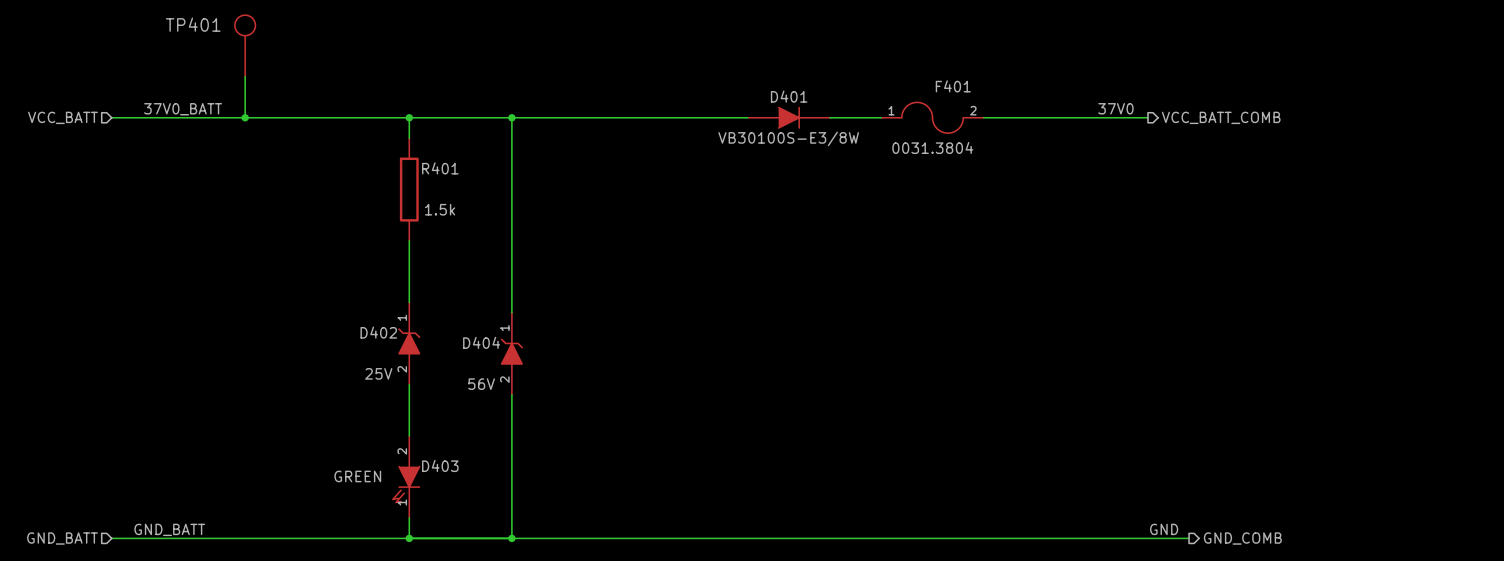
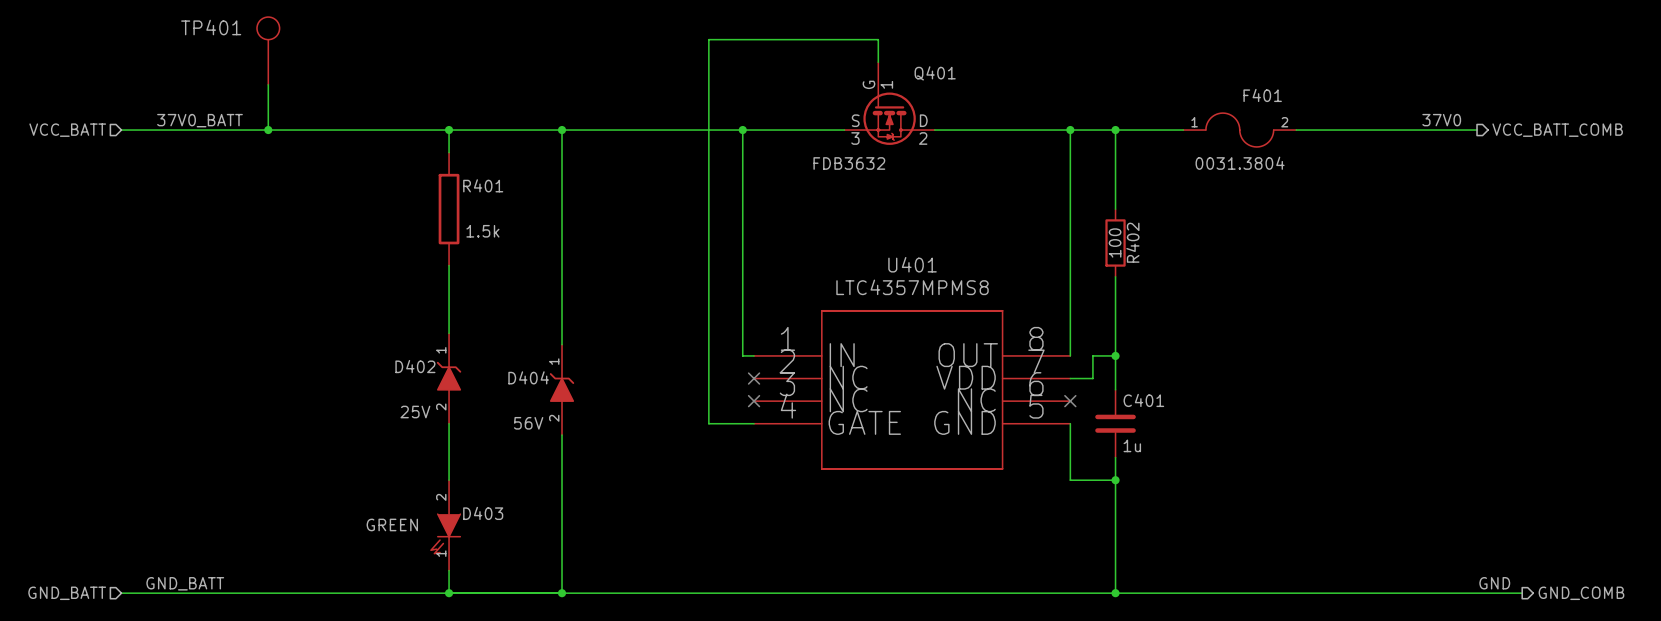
wire: none -> (878, 62) (878, 39) (708, 39) (708, 423) (754, 423)
Q401: none -> FDB3632 (889, 103)
label position: 37V0 (1115, 108) -> 37V0 (1441, 120)
wire: none -> (742, 130) (742, 355) (754, 355)
junction: none -> (742, 130)
D401: VB30100S-E3/8W (788, 117) -> none
wire: none -> (968, 130) (1081, 130)
F401 position: (932, 117) -> (1239, 130)
wire: none -> (1070, 130) (1070, 355)
junction: none -> (1070, 130)
wire: none -> (1115, 130) (1115, 209)
junction: none -> (1115, 130)
wire: (1076, 117) (1147, 117) -> none
wire: none -> (1296, 130) (1477, 130)
hierarchical label position: VCC_BATT_COMB (1221, 117) -> VCC_BATT_COMB (1557, 130)
R402: none -> 100 (1115, 242)
wire: none -> (1115, 276) (1115, 389)
wire: none -> (1115, 355) (1092, 355) (1092, 378) (1070, 378)
junction: none -> (1115, 355)
no-connect mark: none -> (754, 378)
U401: none -> LTC4357MPMS8 (912, 389)
no-connect mark: none -> (754, 401)
no-connect mark: none -> (1070, 401)
wire: none -> (1070, 423) (1070, 480) (1115, 480)
C401: none -> 1u (1115, 423)
wire: none -> (1115, 457) (1115, 593)
junction: none -> (1115, 480)
label position: GND (1164, 529) -> GND (1494, 583)
junction: none -> (1115, 593)
wire: none -> (1307, 593) (1522, 593)
hierarchical label position: GND_COMB (1242, 538) -> GND_COMB (1581, 593)

